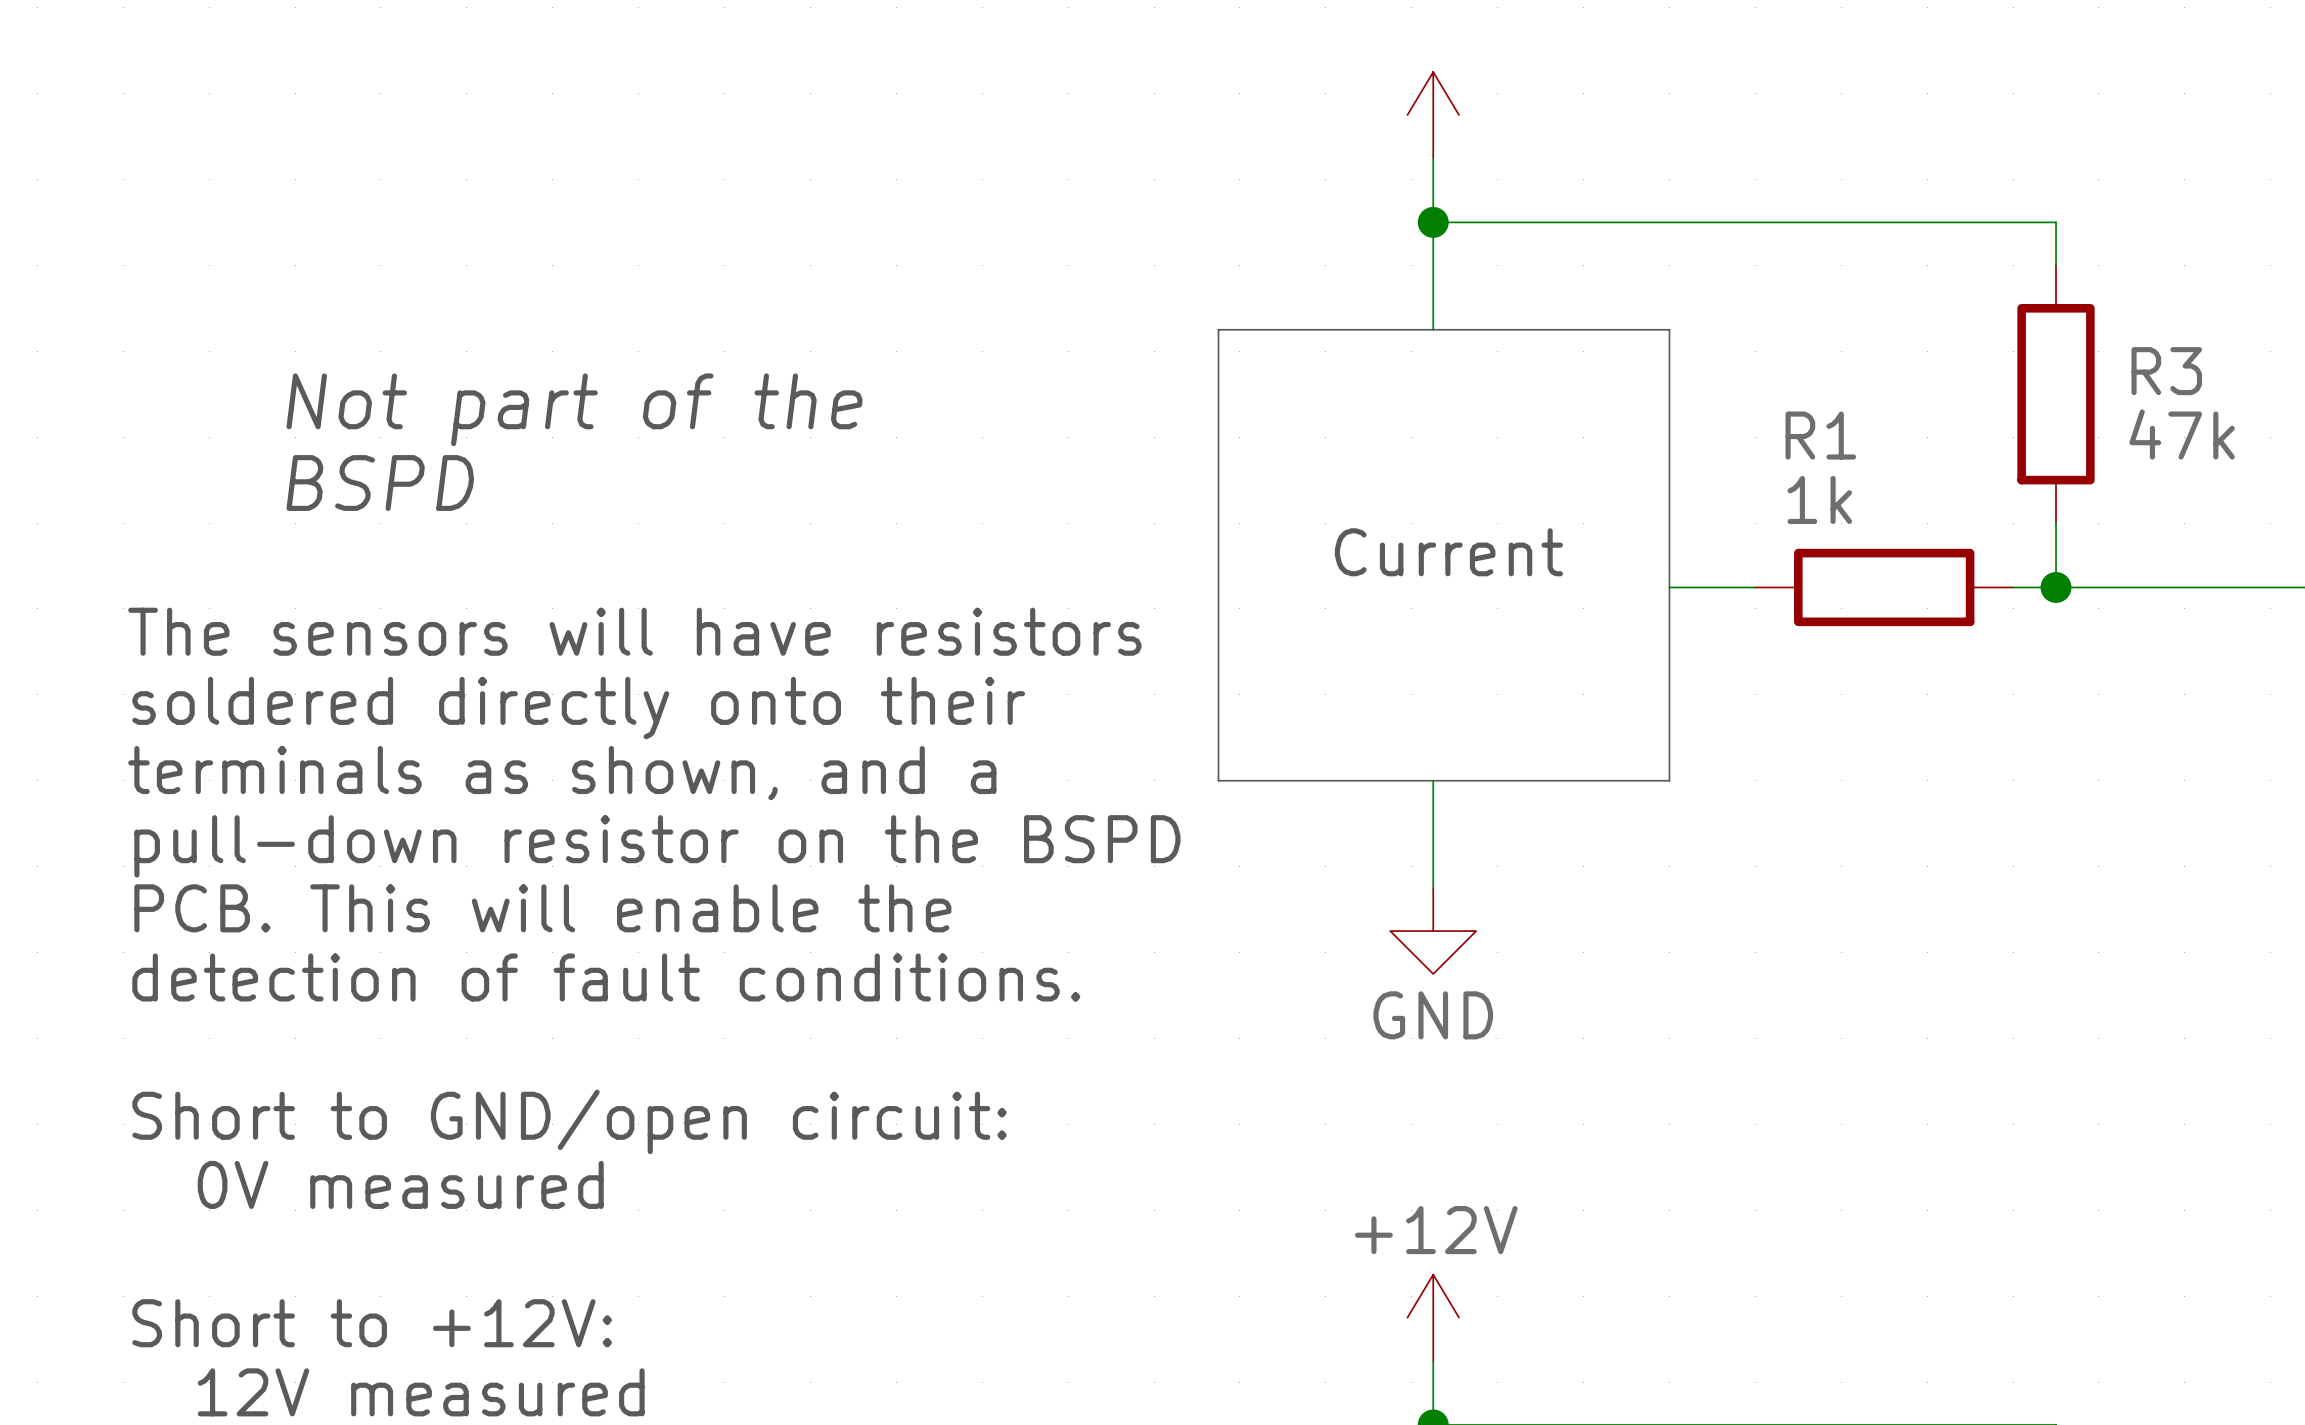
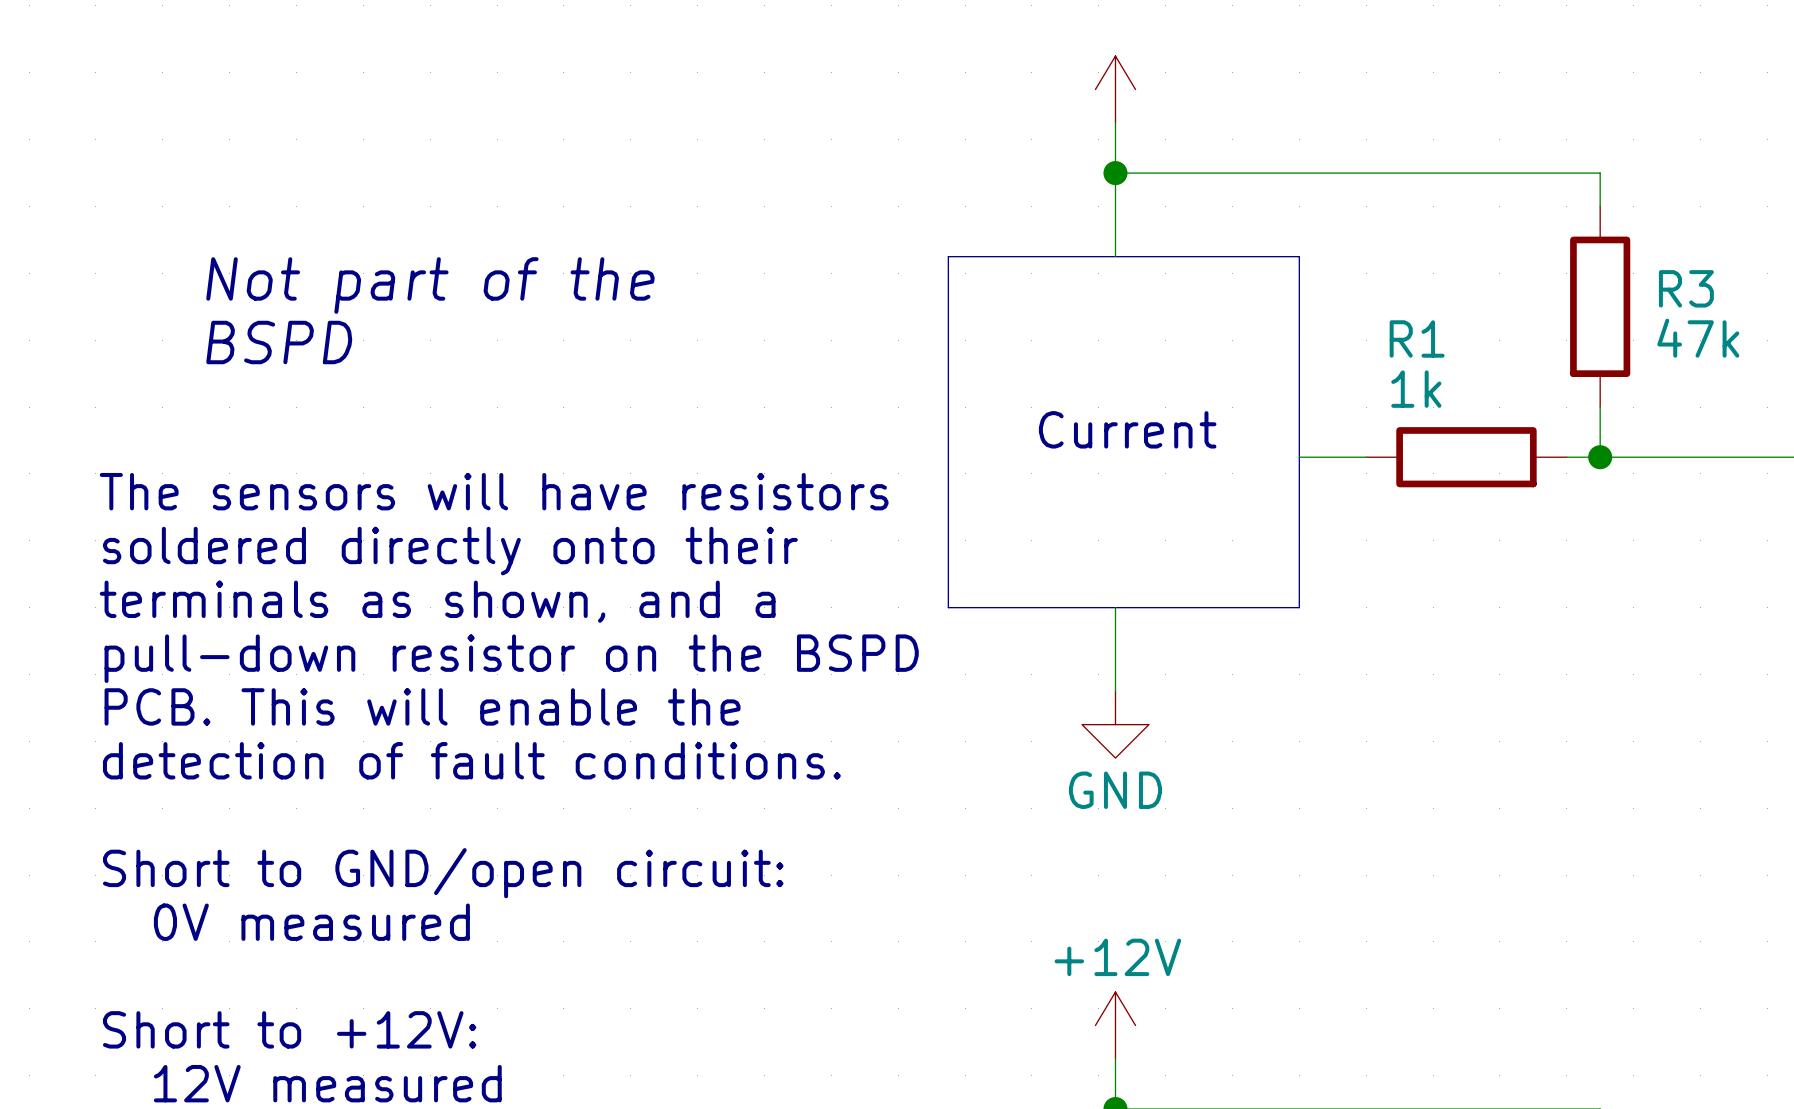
text position: Not part of the (574, 409) -> Not part of the (430, 285)
text position: BSPD (380, 483) -> BSPD (279, 342)

